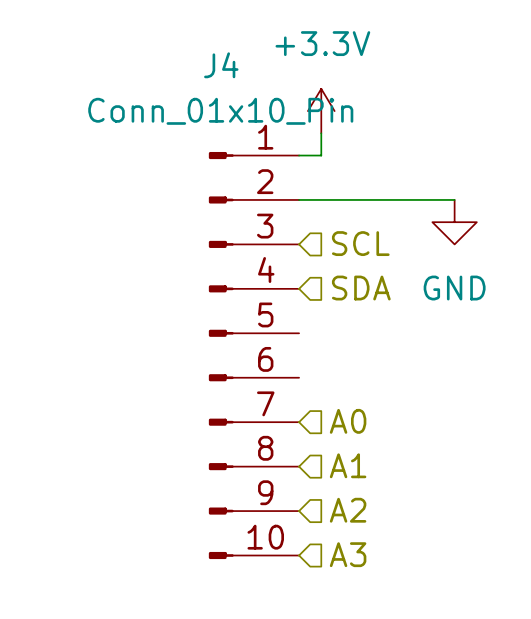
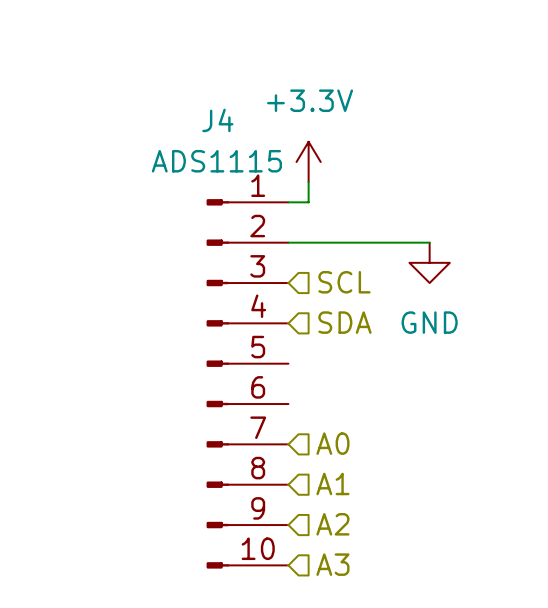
J4 value: Conn_01x10_Pin (220, 111) -> ADS1115 (216, 161)

